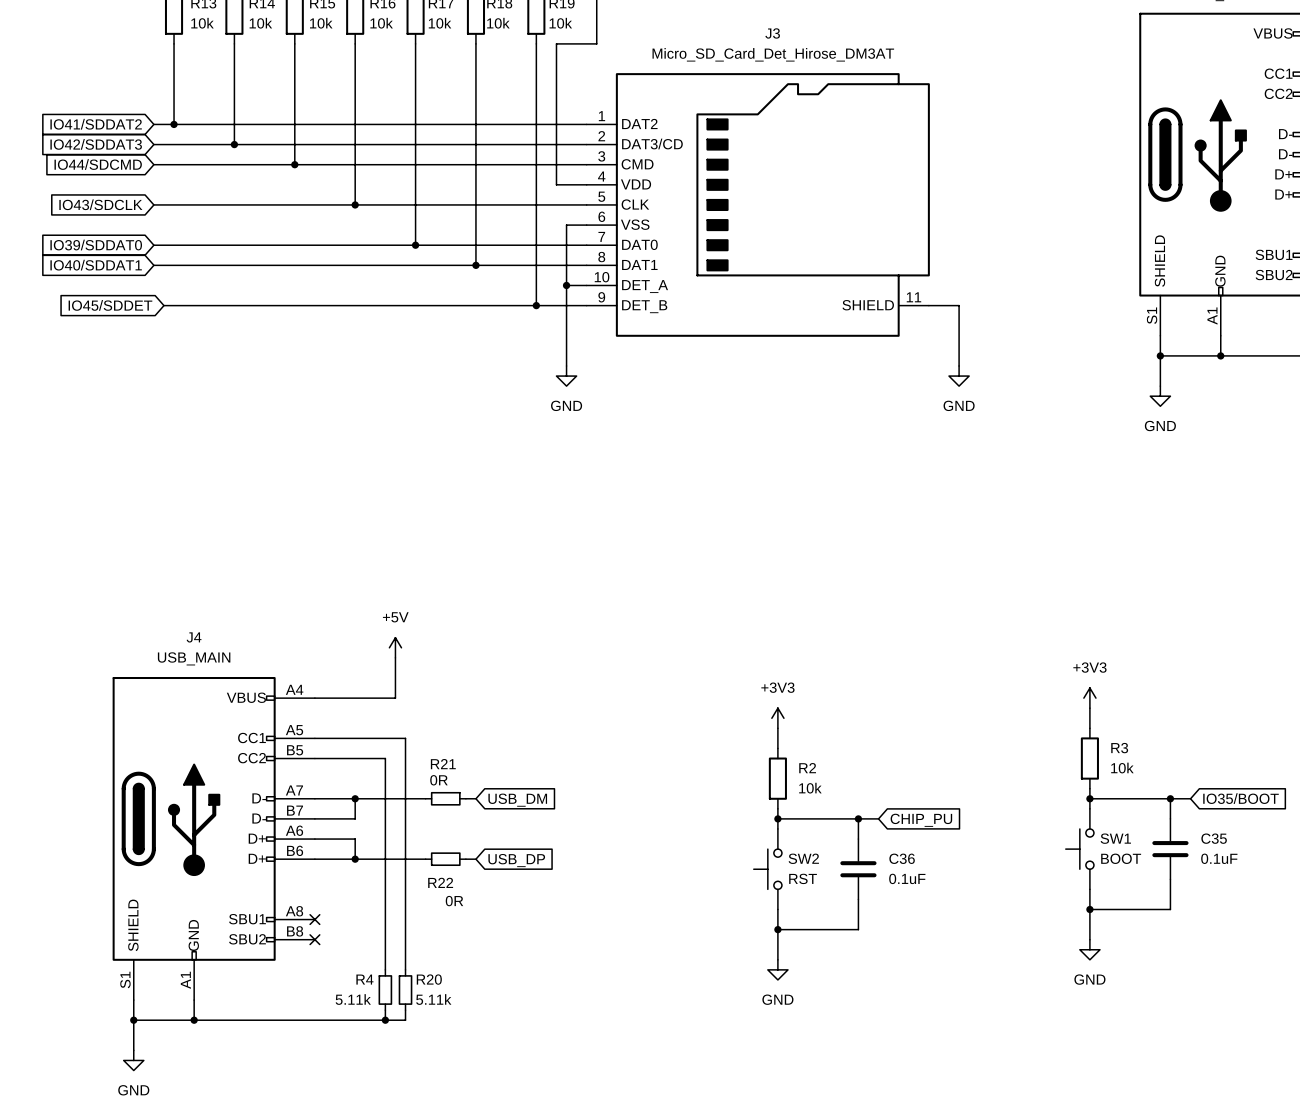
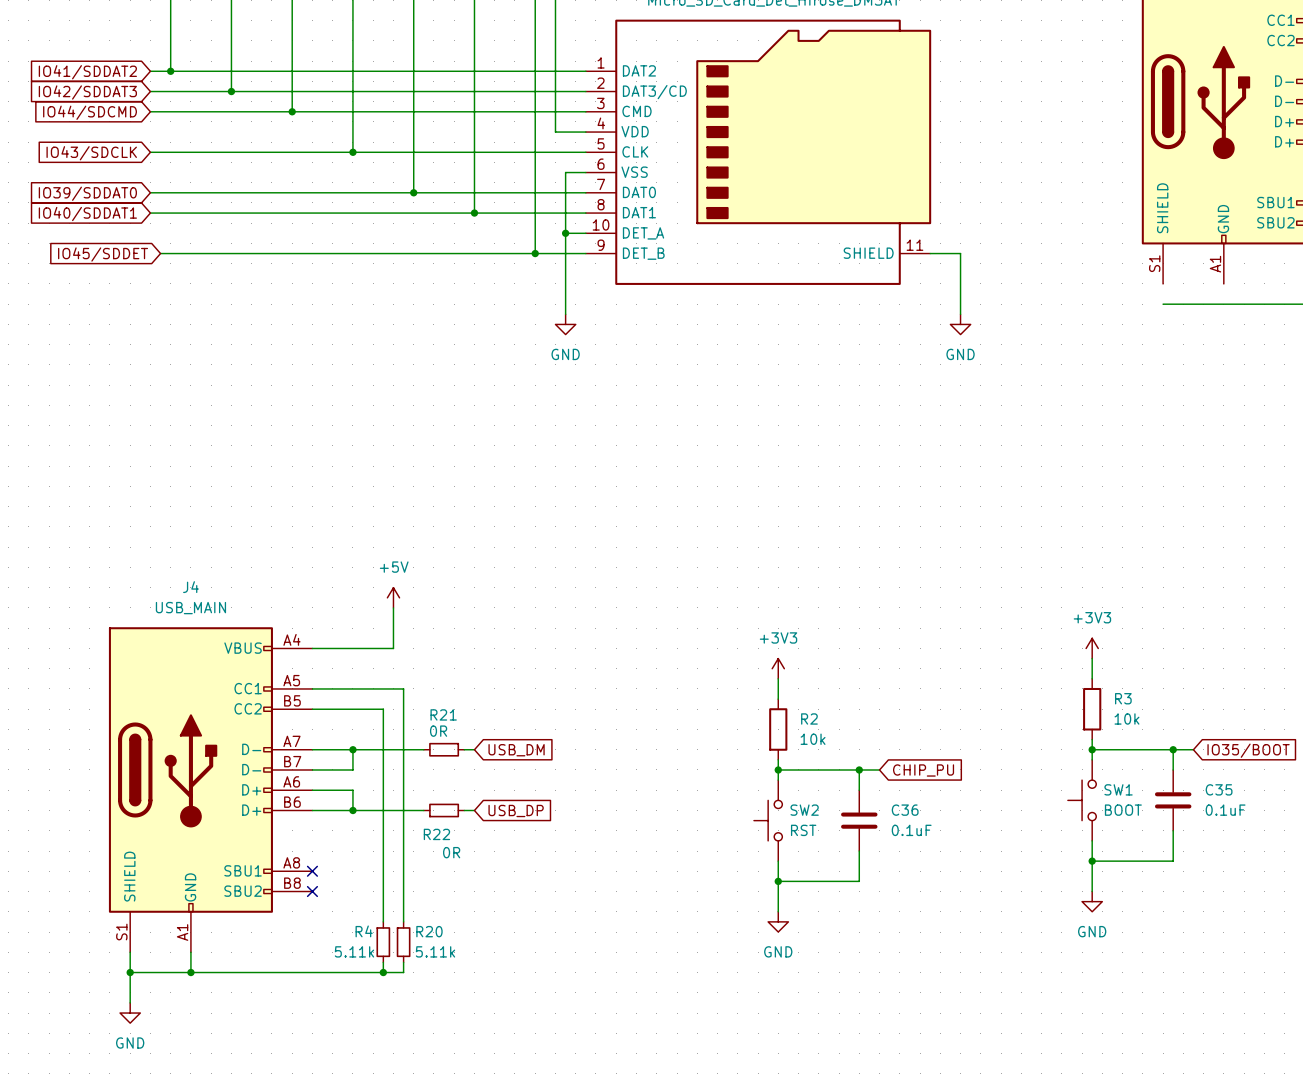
wire: (1160, 335) (1160, 386) -> none
wire: (1220, 335) (1220, 355) -> none
junction: (1160, 355) -> none
junction: (1220, 355) -> none
power symbol: GND (1160, 396) -> none

